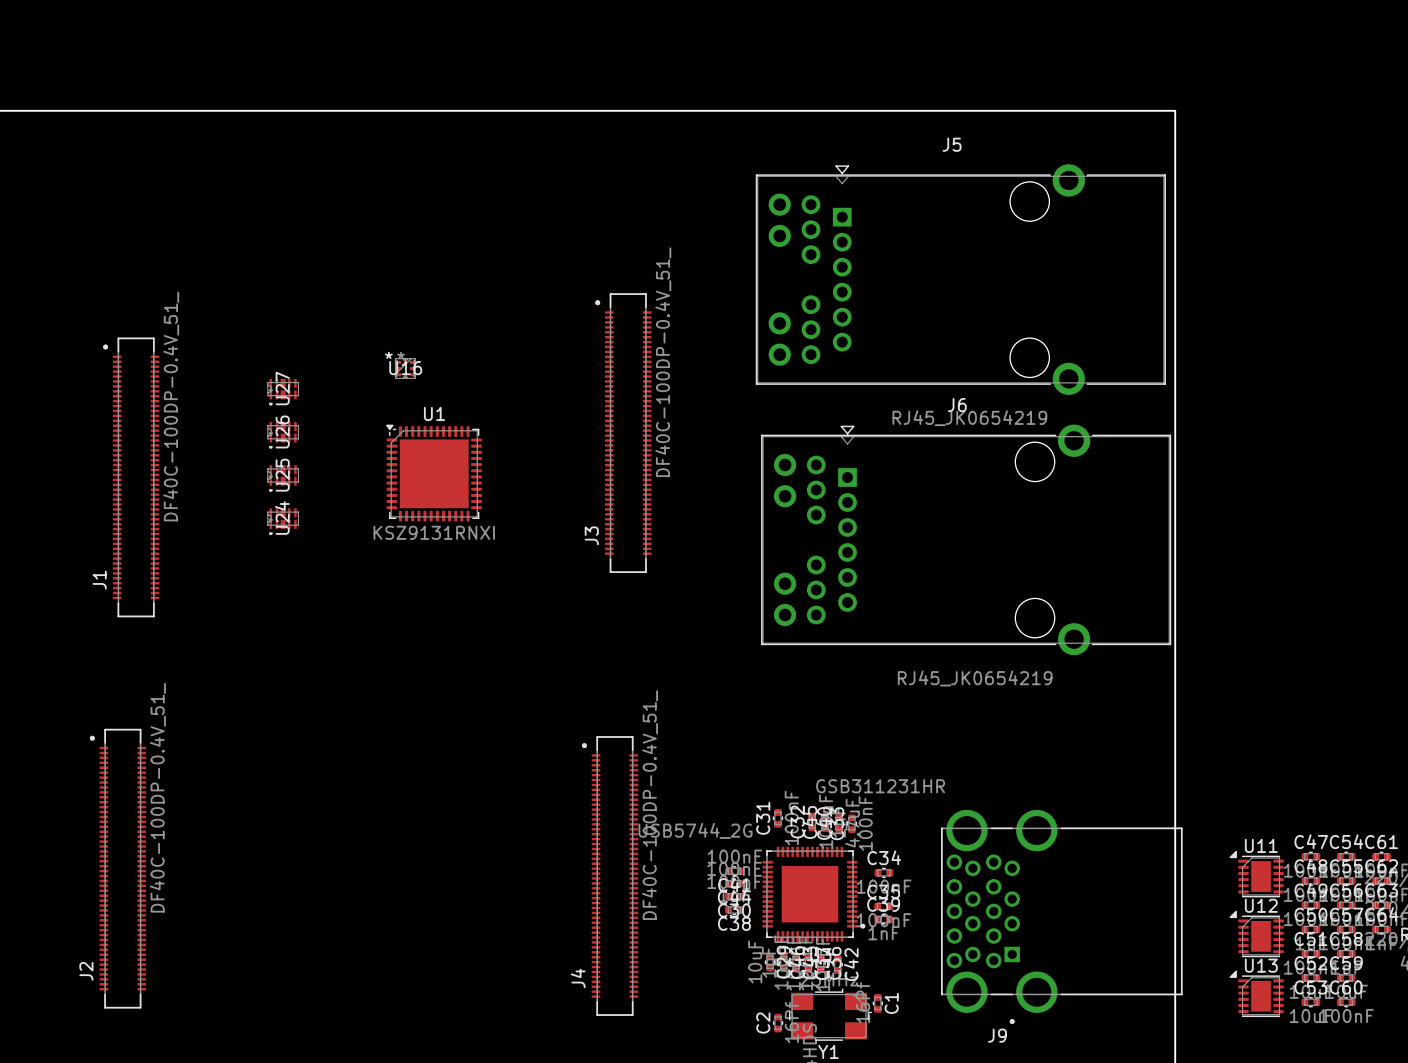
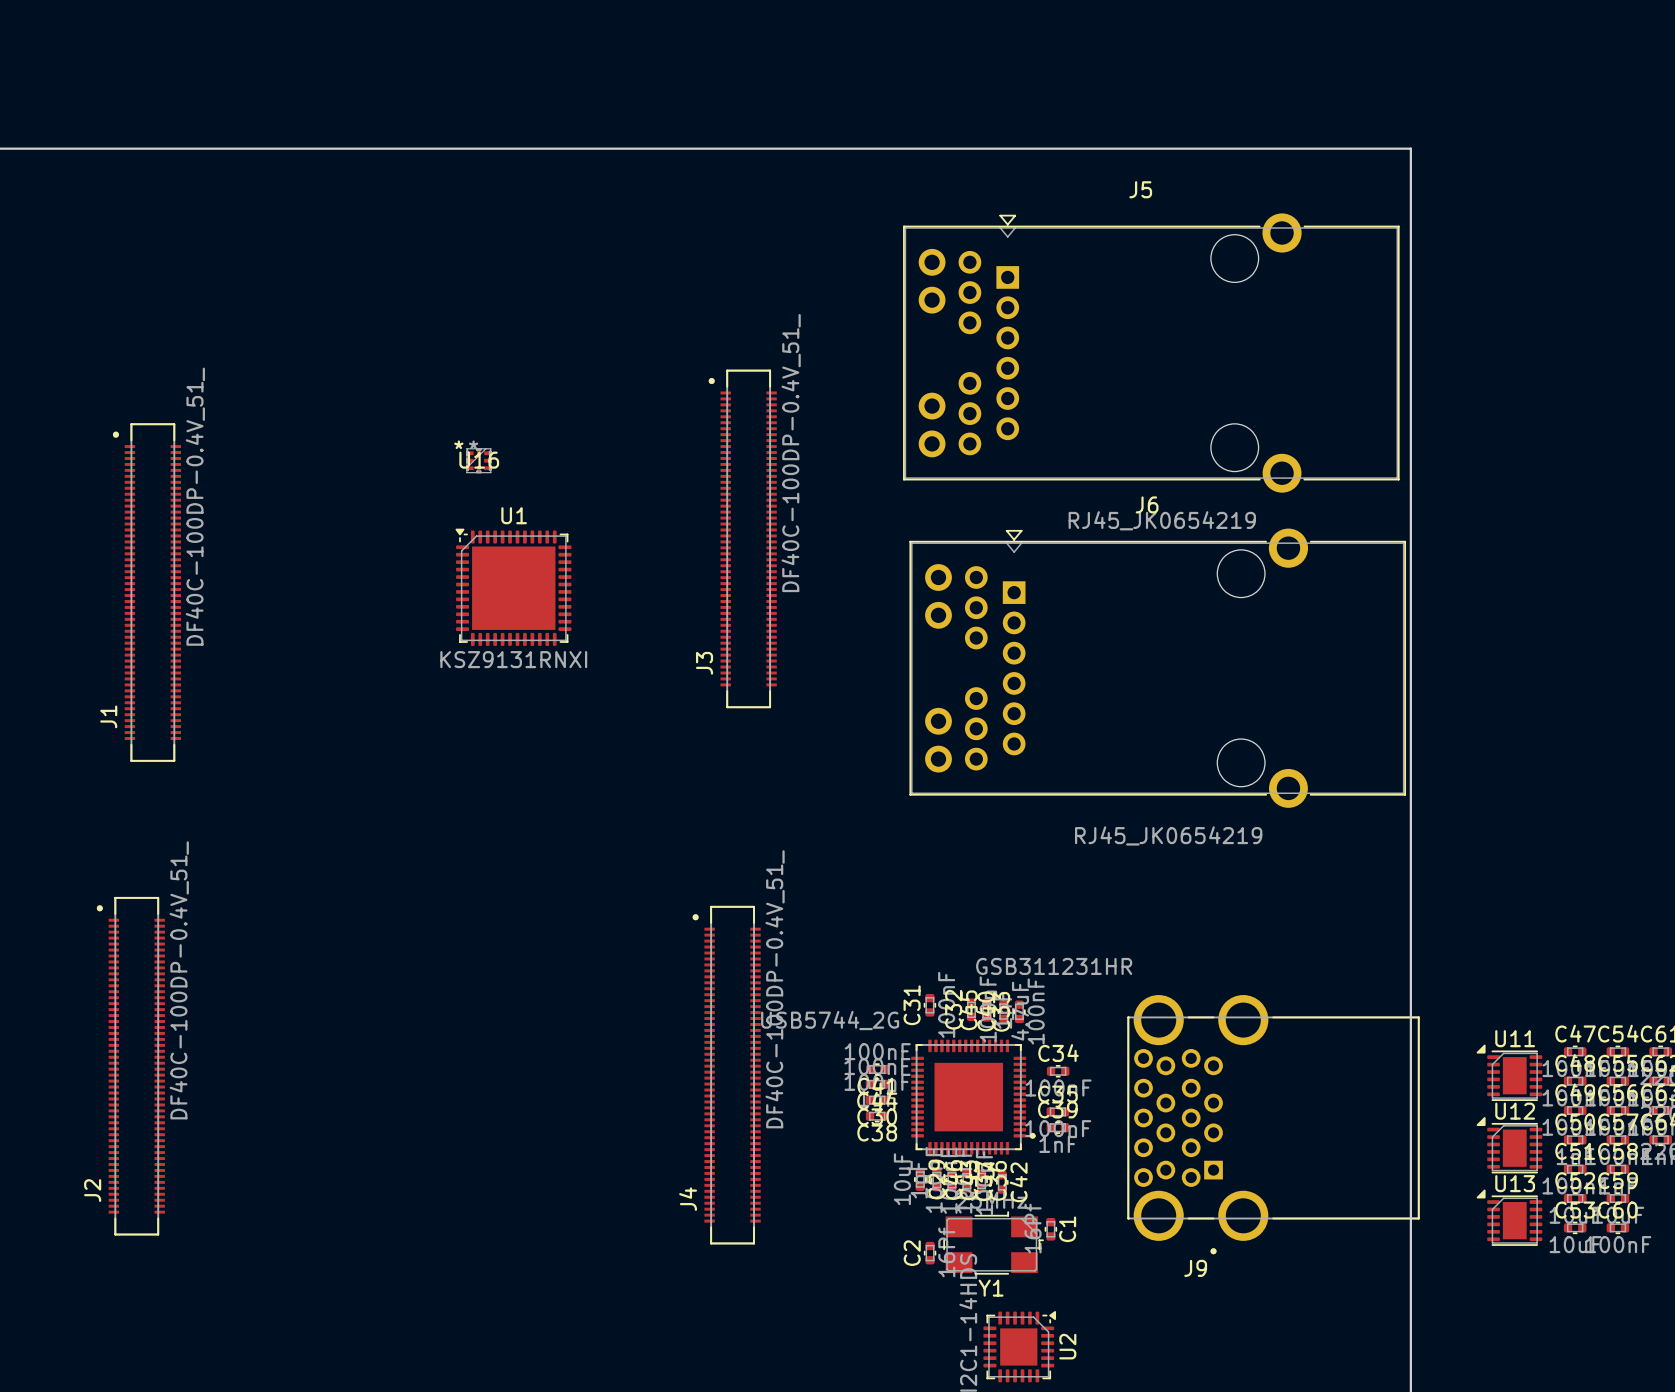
U27: (283, 392) -> none
U26: (283, 435) -> none
U25: (283, 478) -> none
U24: (283, 521) -> none

